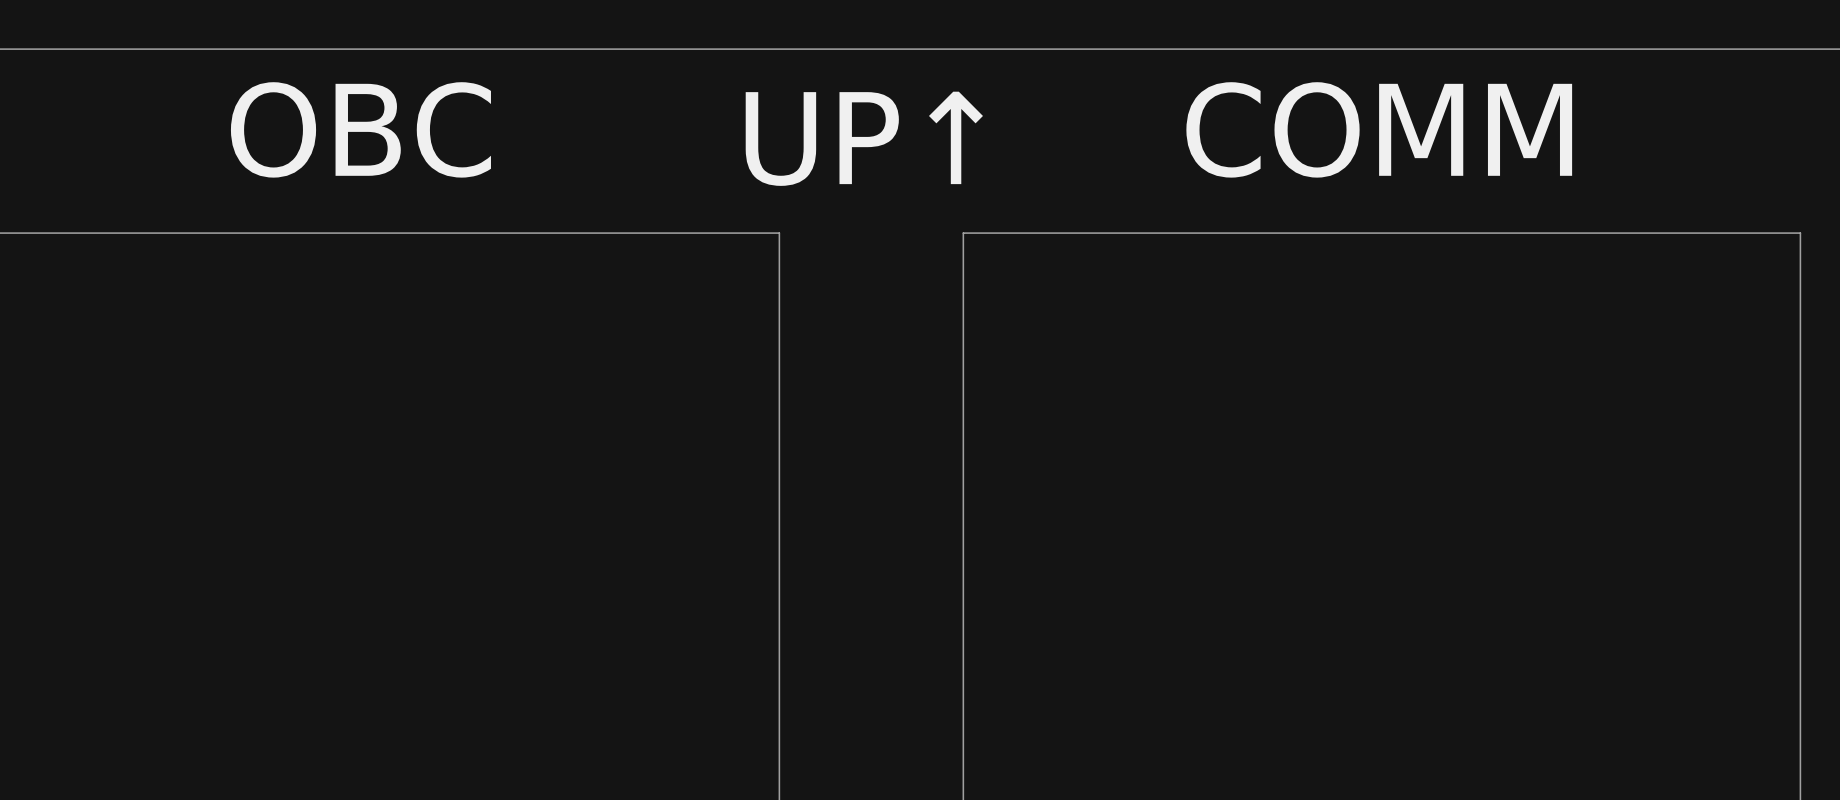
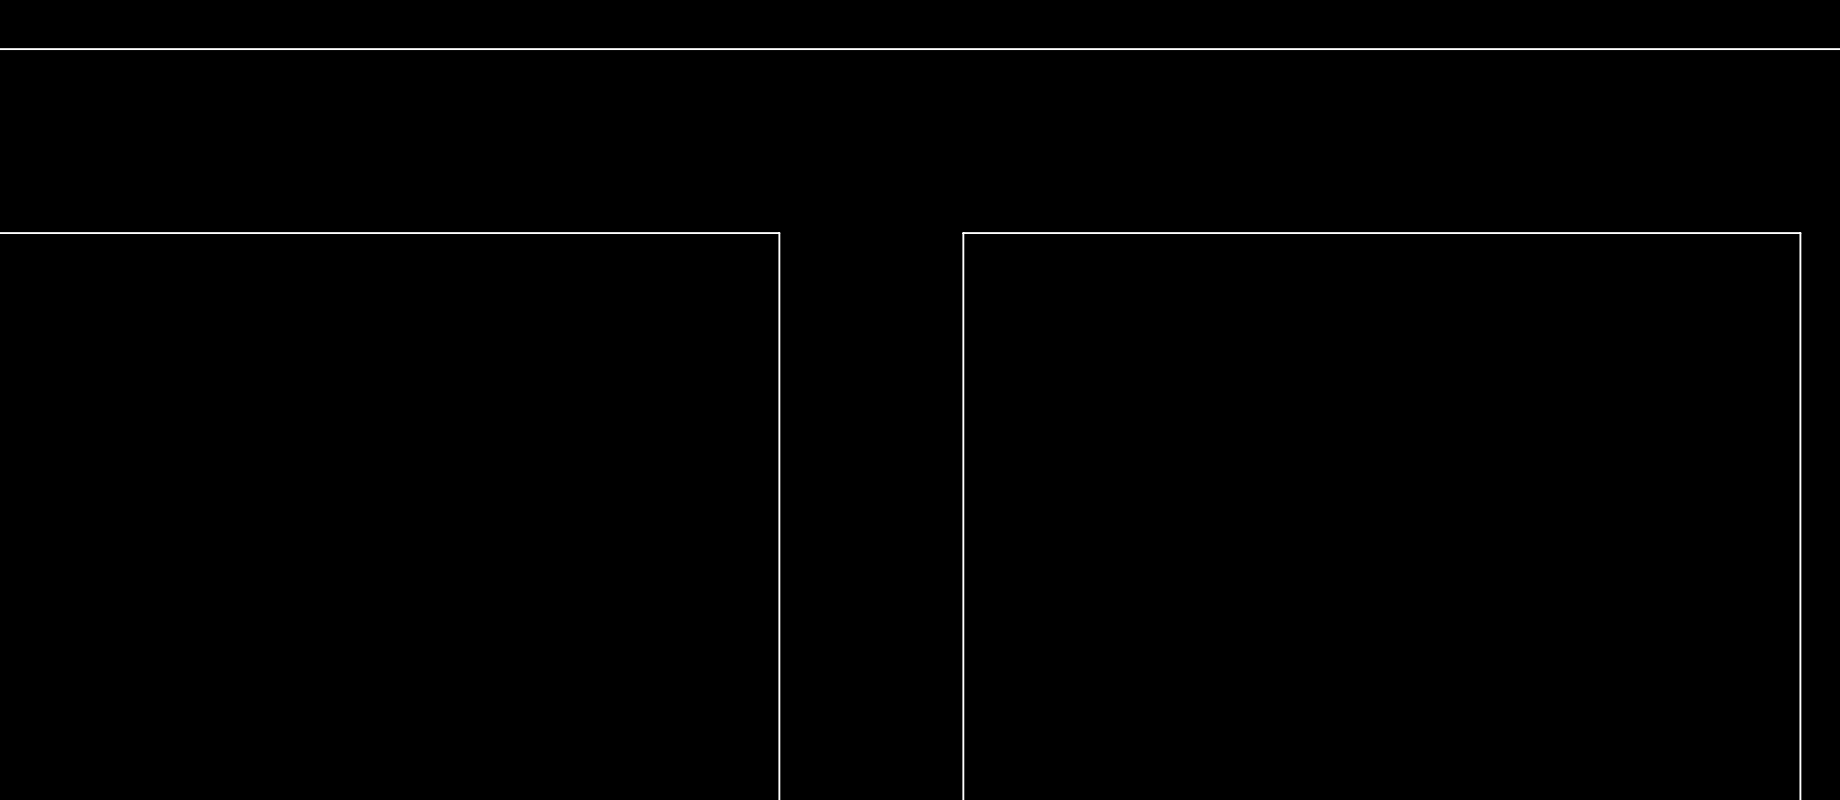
text: OBC (360, 129) -> none
text: COMM (1379, 129) -> none
text: UP↑ (864, 138) -> none

